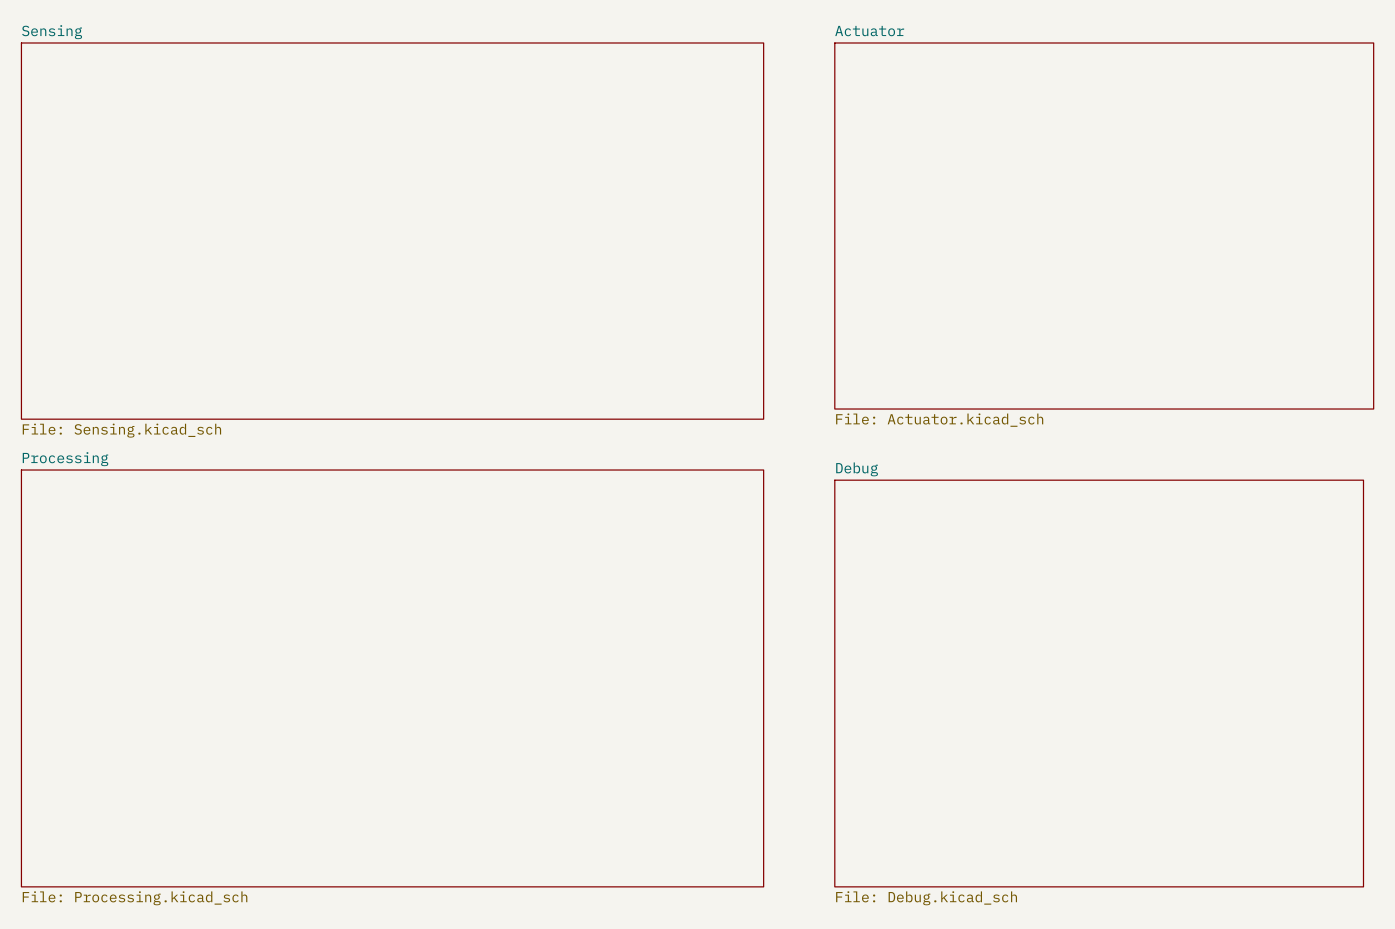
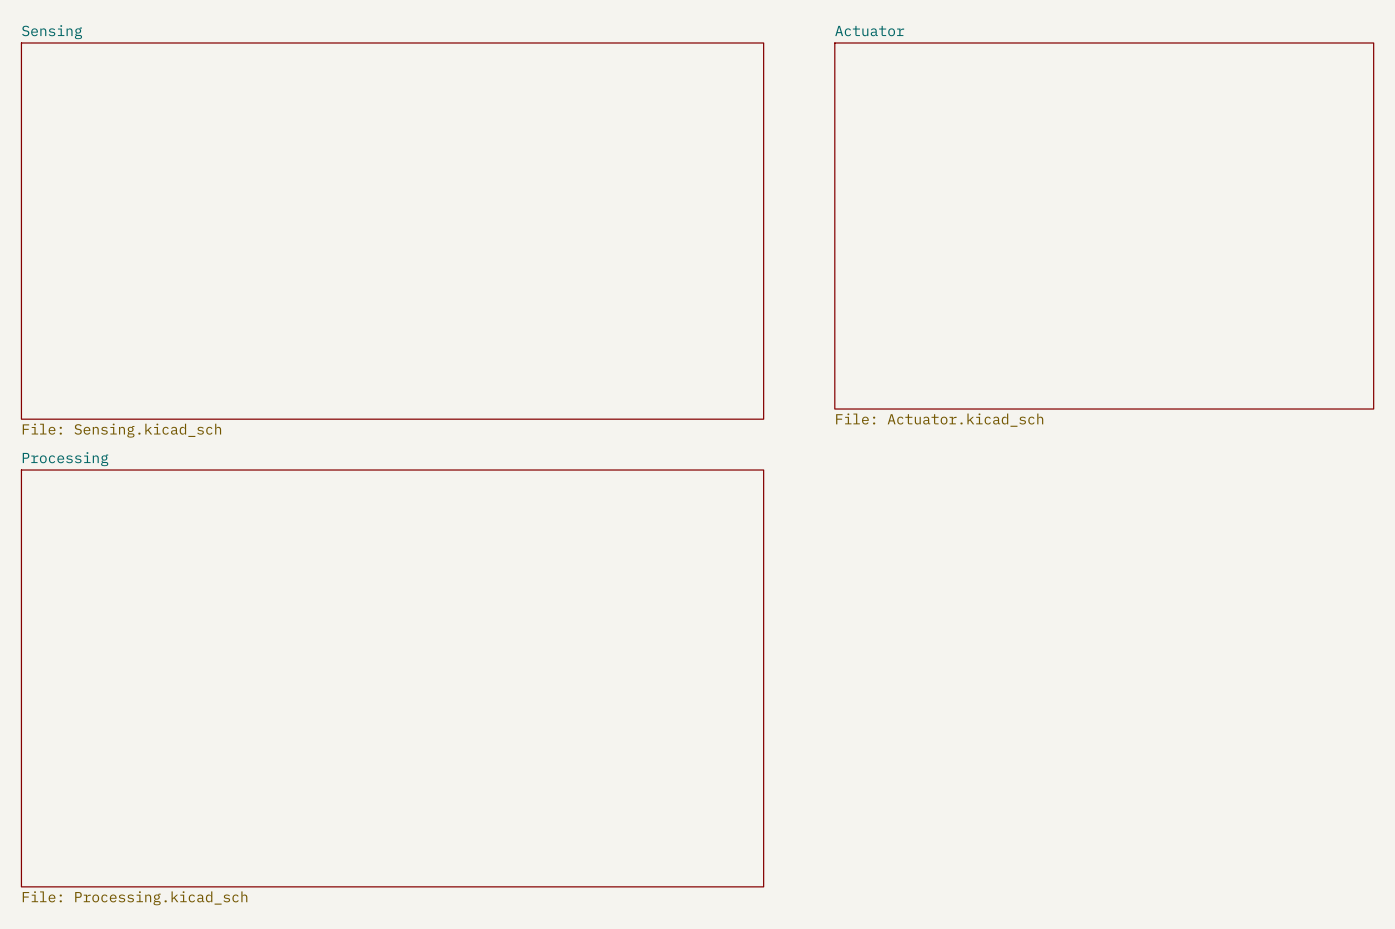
sheet Debug: File: Debug.kicad_sch (1099, 683) -> none

